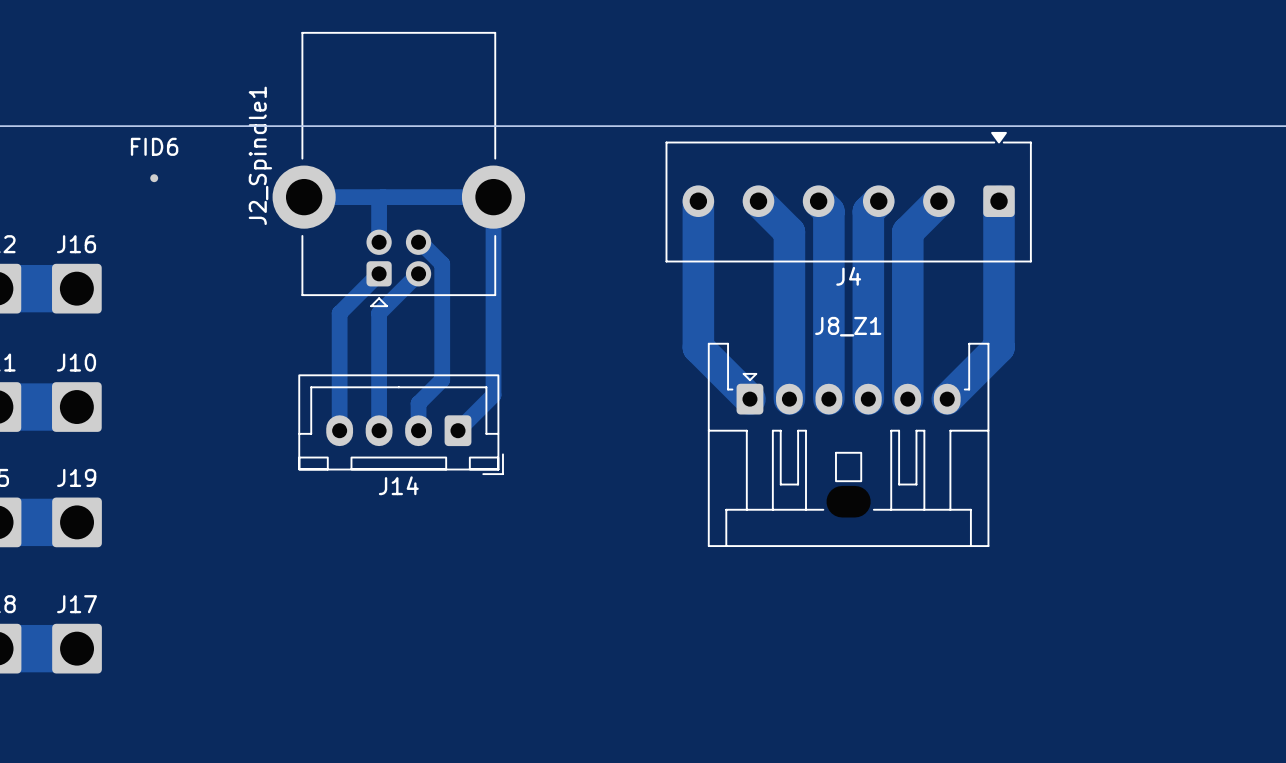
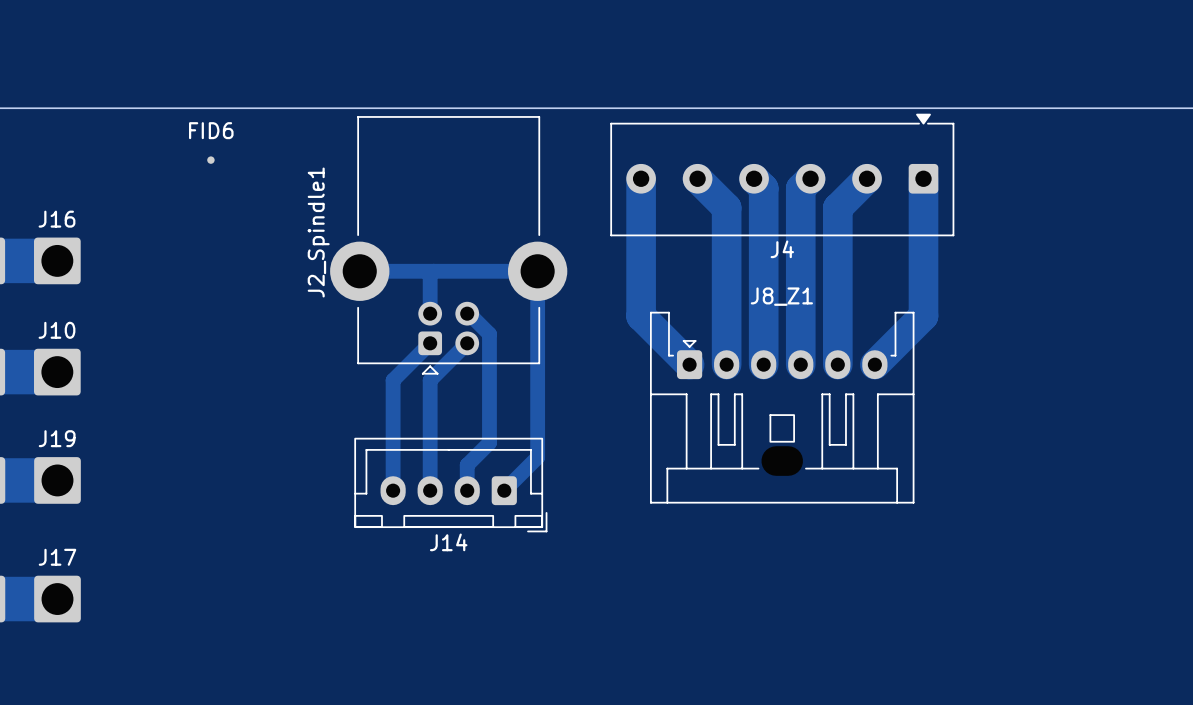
J2_Spindle1 position: (398, 169) -> (448, 245)
FID6 position: (154, 178) -> (210, 160)
track: (304, 197) (493, 197) (493, 395) (458, 430) -> (359, 271) (537, 271) (537, 457) (504, 490)
track: (383, 197) (379, 201) (379, 242) -> (433, 271) (430, 274) (430, 313)
track: (418, 242) (442, 264) (442, 379) (418, 403) (418, 430) -> (467, 313) (489, 334) (489, 442) (467, 465) (467, 490)
track: (379, 273) (339, 313) (339, 430) -> (467, 343) (430, 380) (430, 490)
track: (418, 273) (379, 313) (379, 430) -> (430, 343) (393, 380) (393, 490)
J14 position: (401, 424) -> (450, 485)

